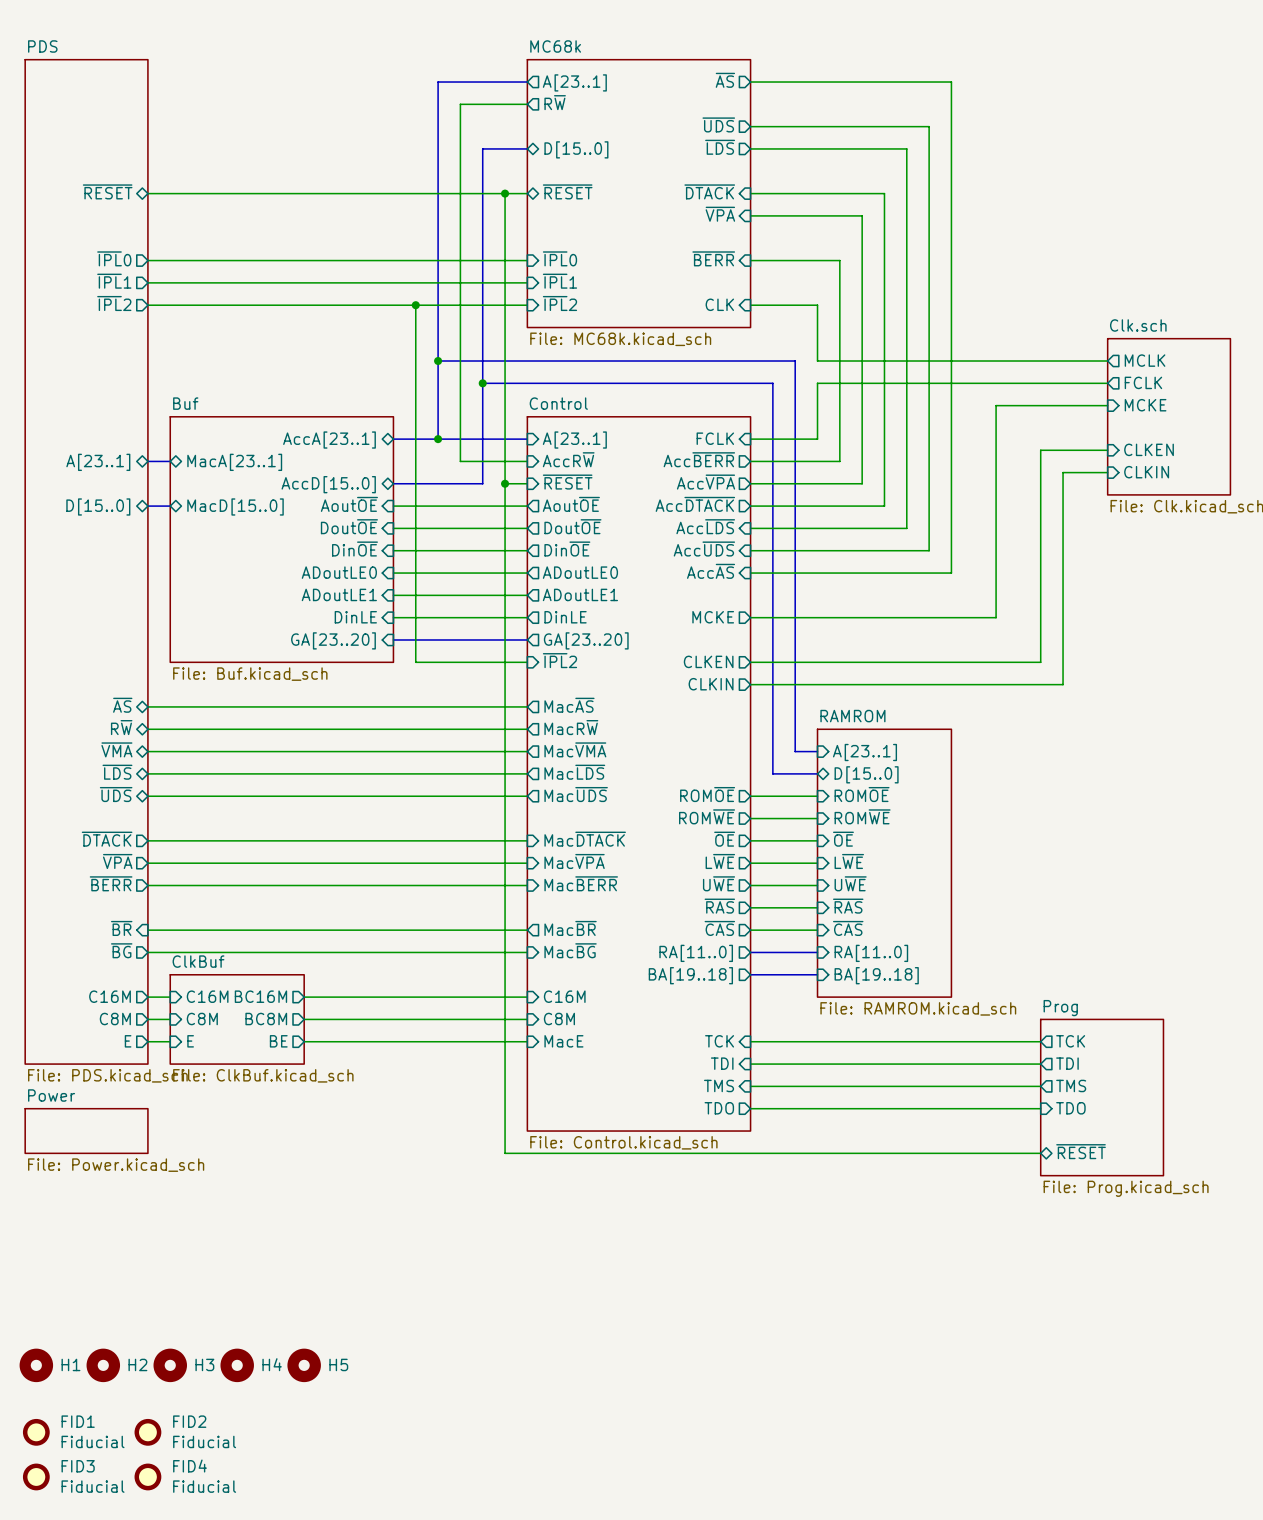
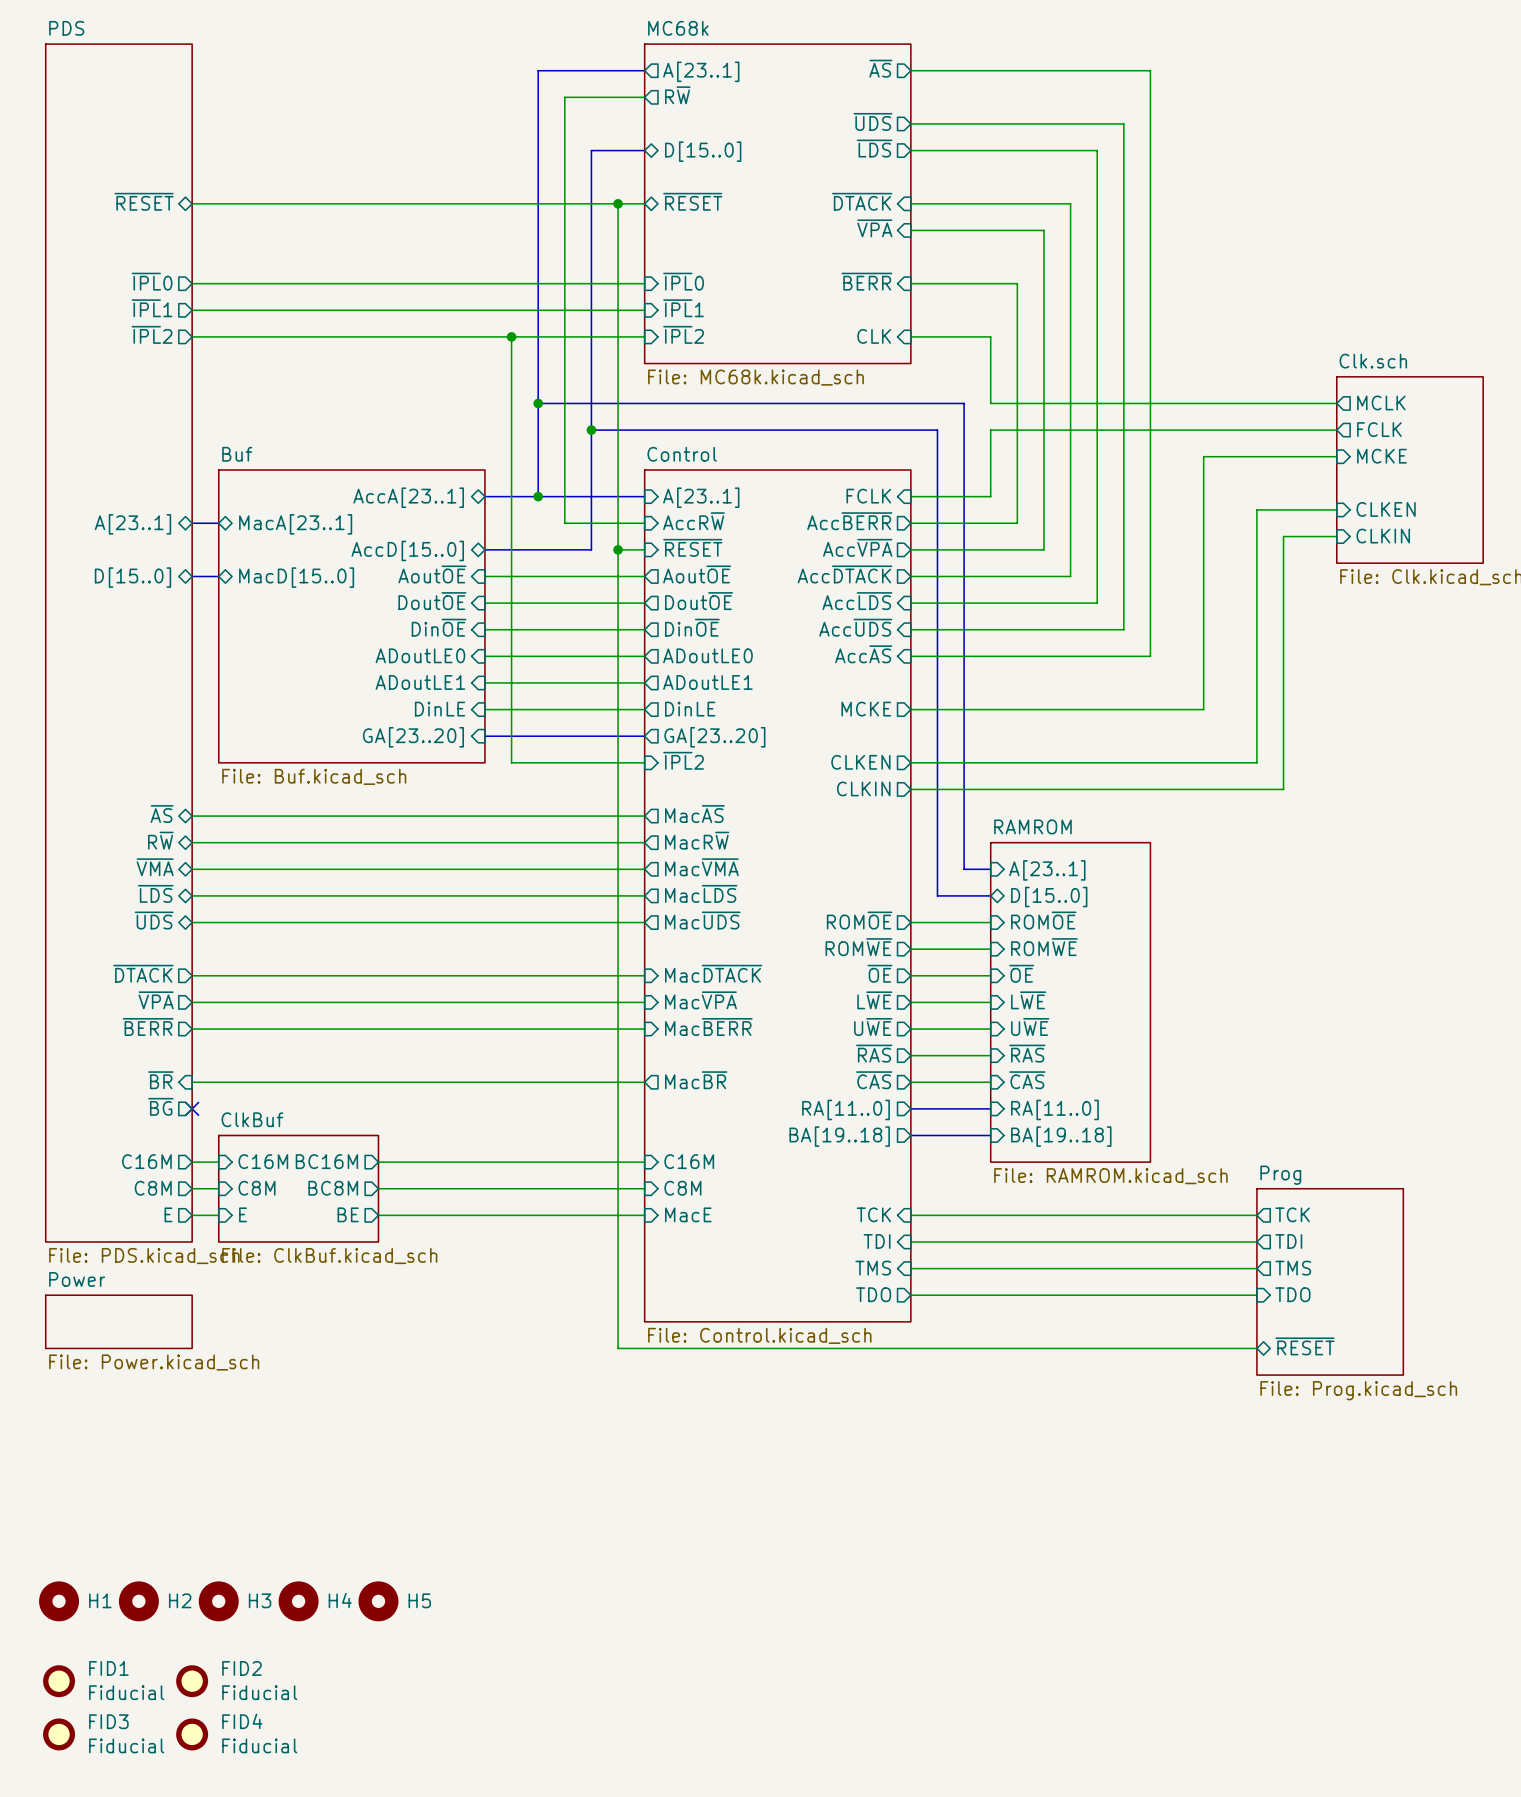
sheet pin: Mac~{BG} (570, 950) -> none
wire: (147, 952) (527, 952) -> none
no-connect mark: none -> (192, 1108)

